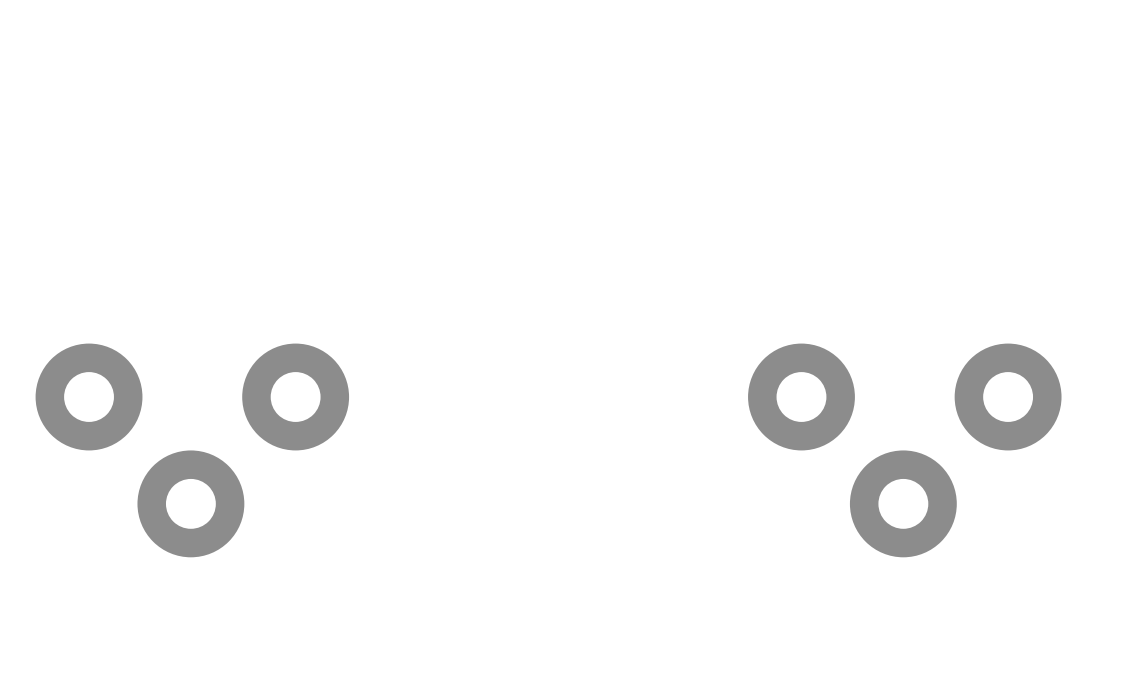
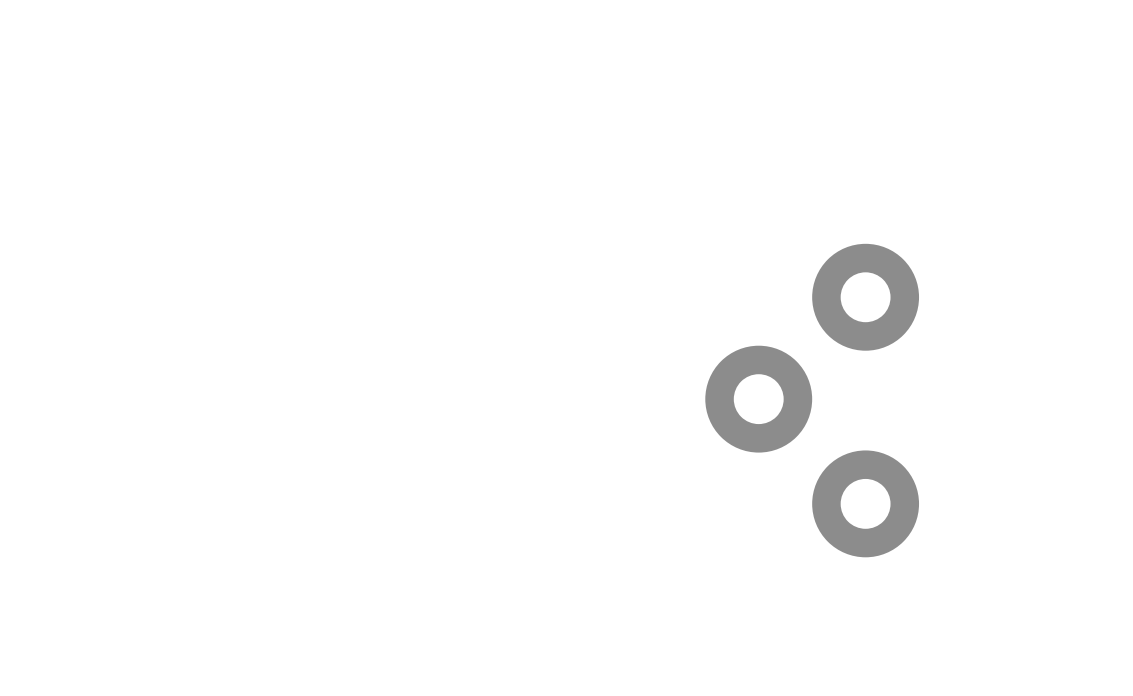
part: (192, 450) -> none
part rotation: 0° (904, 450) -> 90° clockwise (812, 400)

